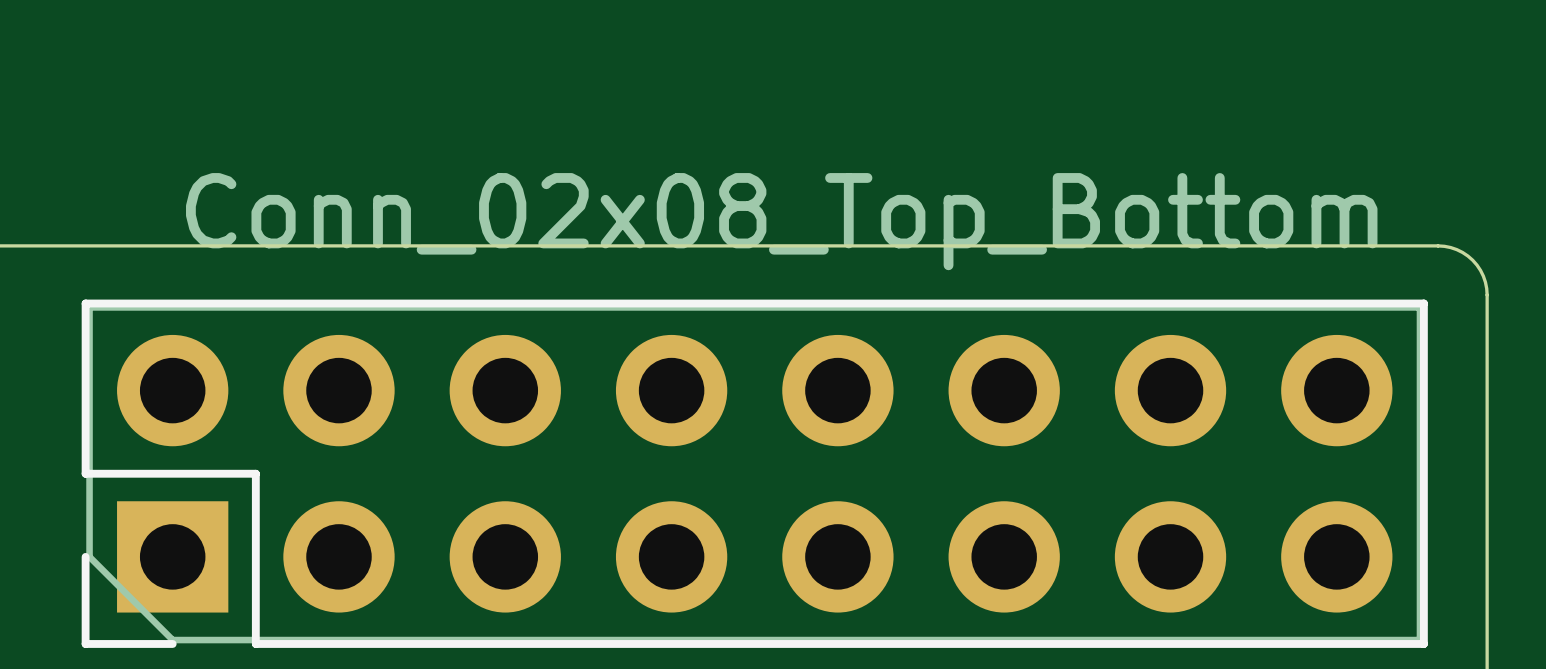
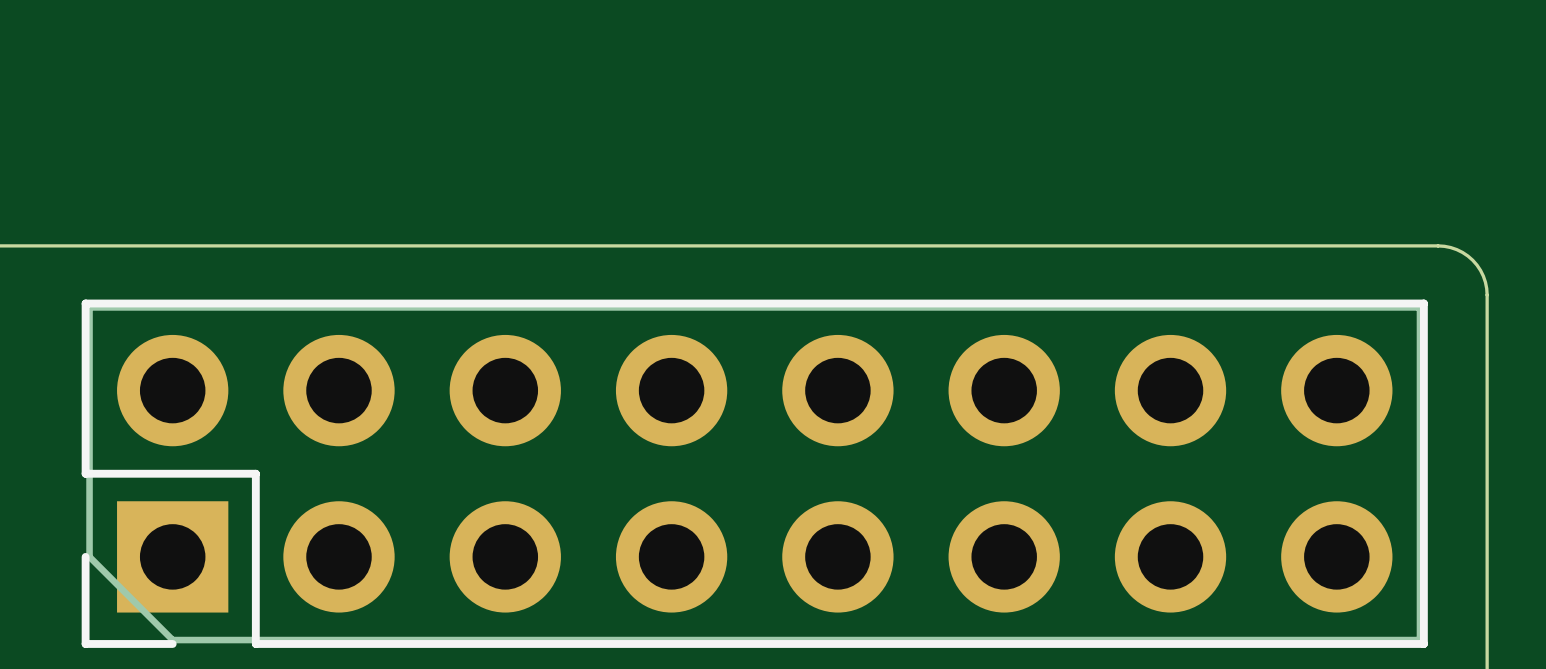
part value: Conn_02x08_Top_Bottom (781, 221) -> none

